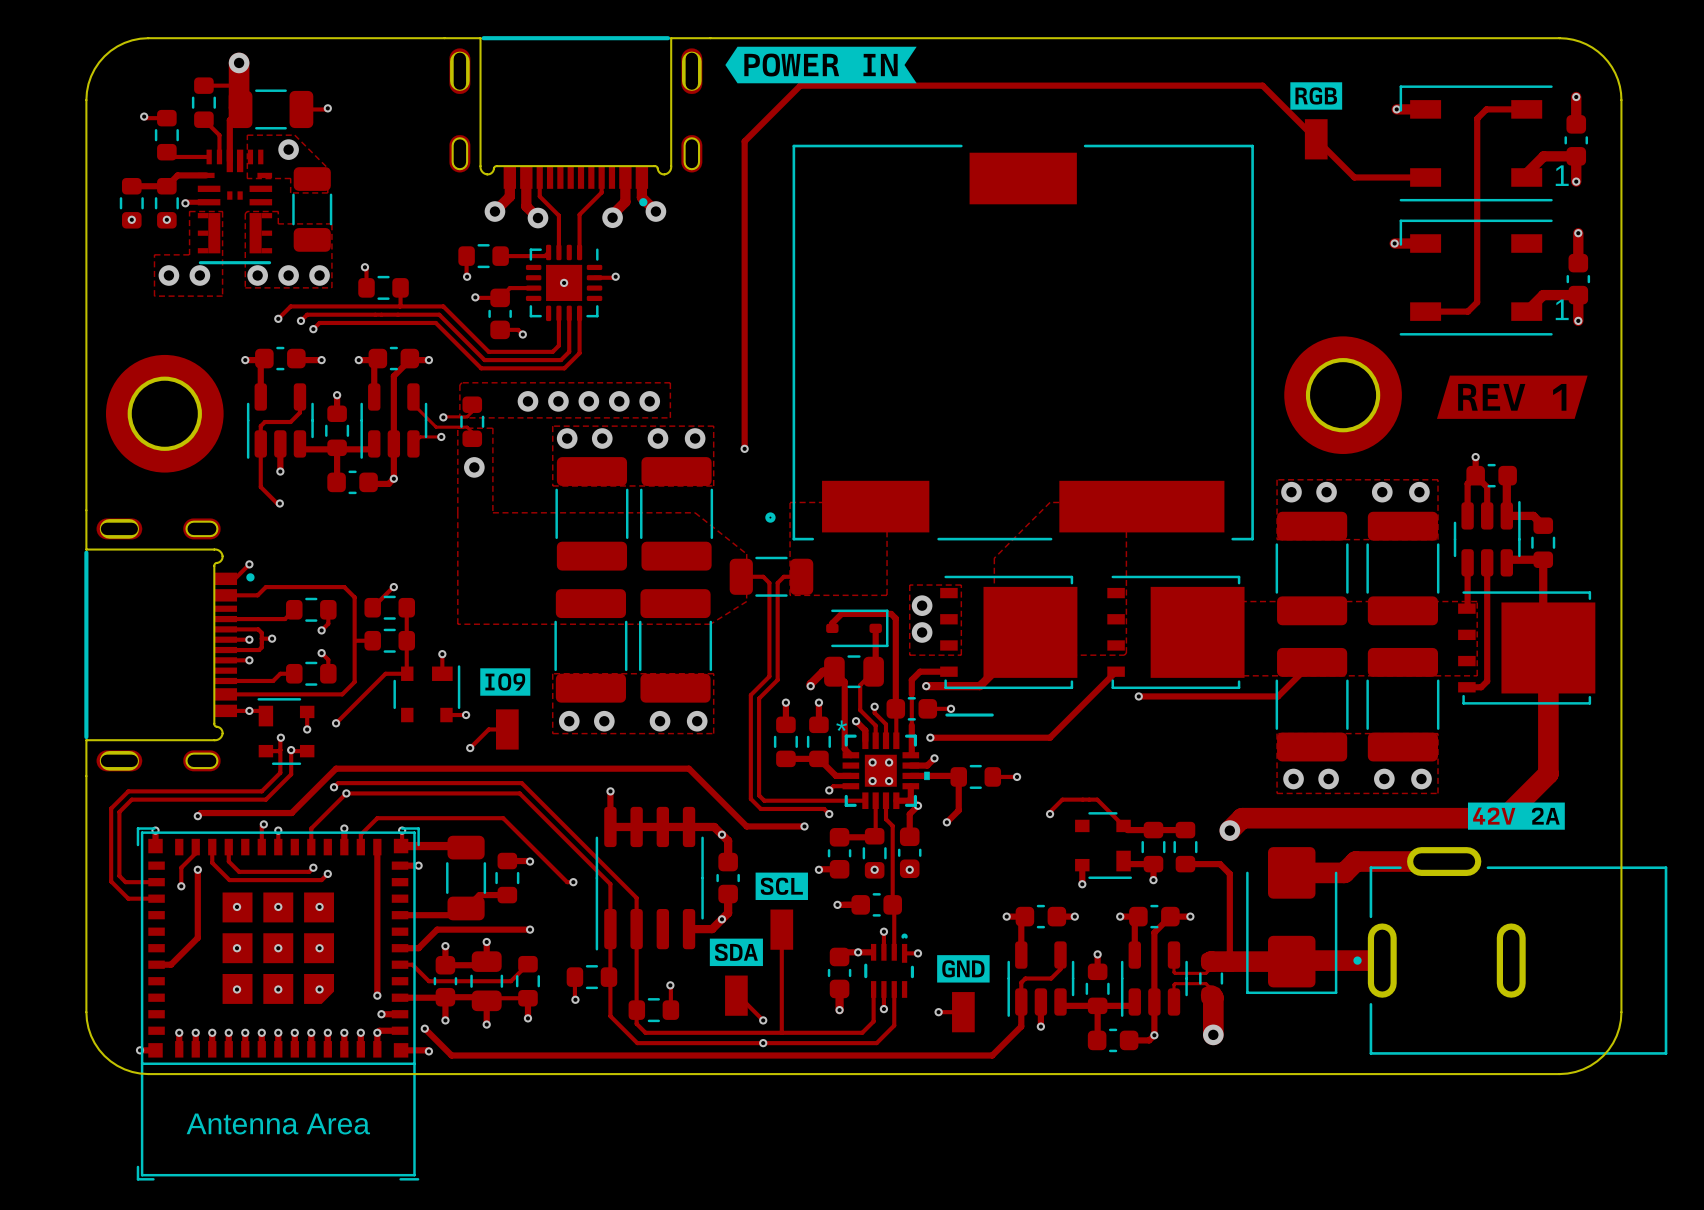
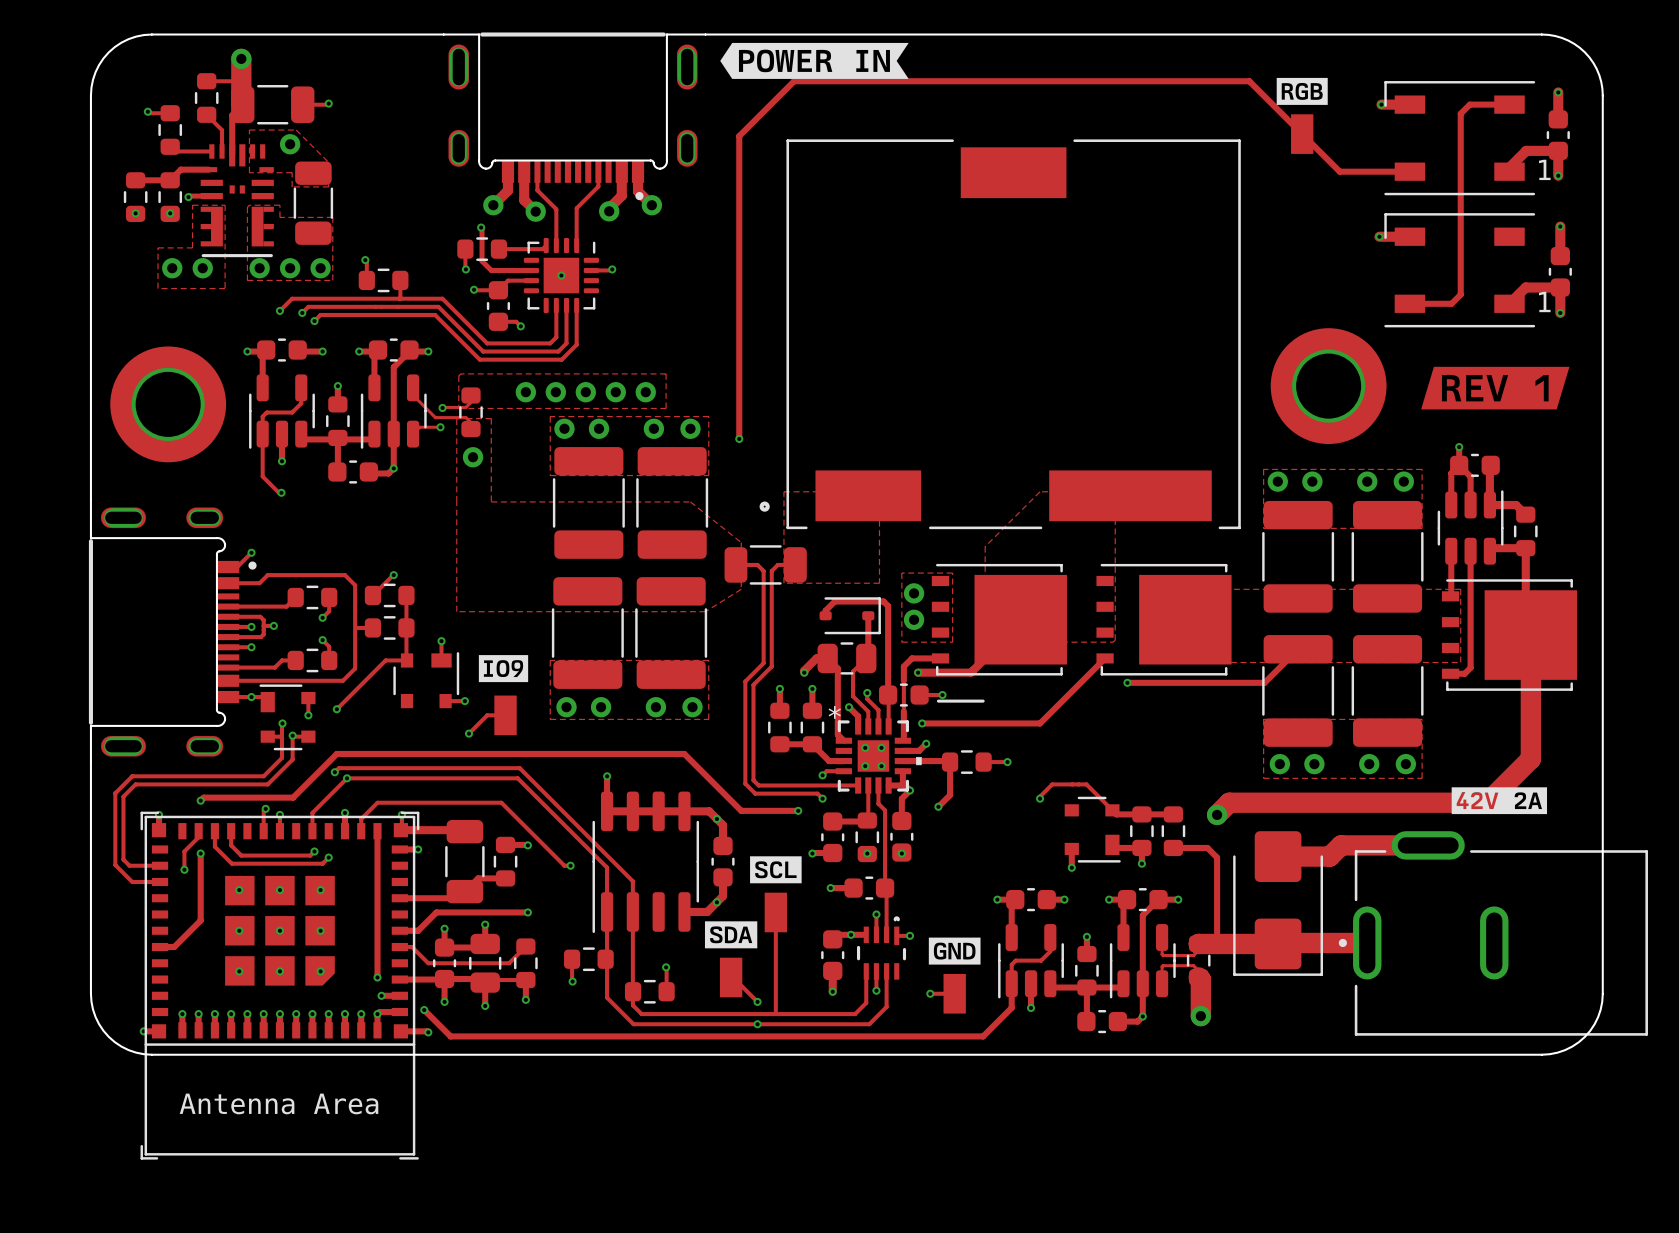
track: none -> (481, 227) (482, 261) (491, 270) (531, 270)
via: none -> (481, 227)

